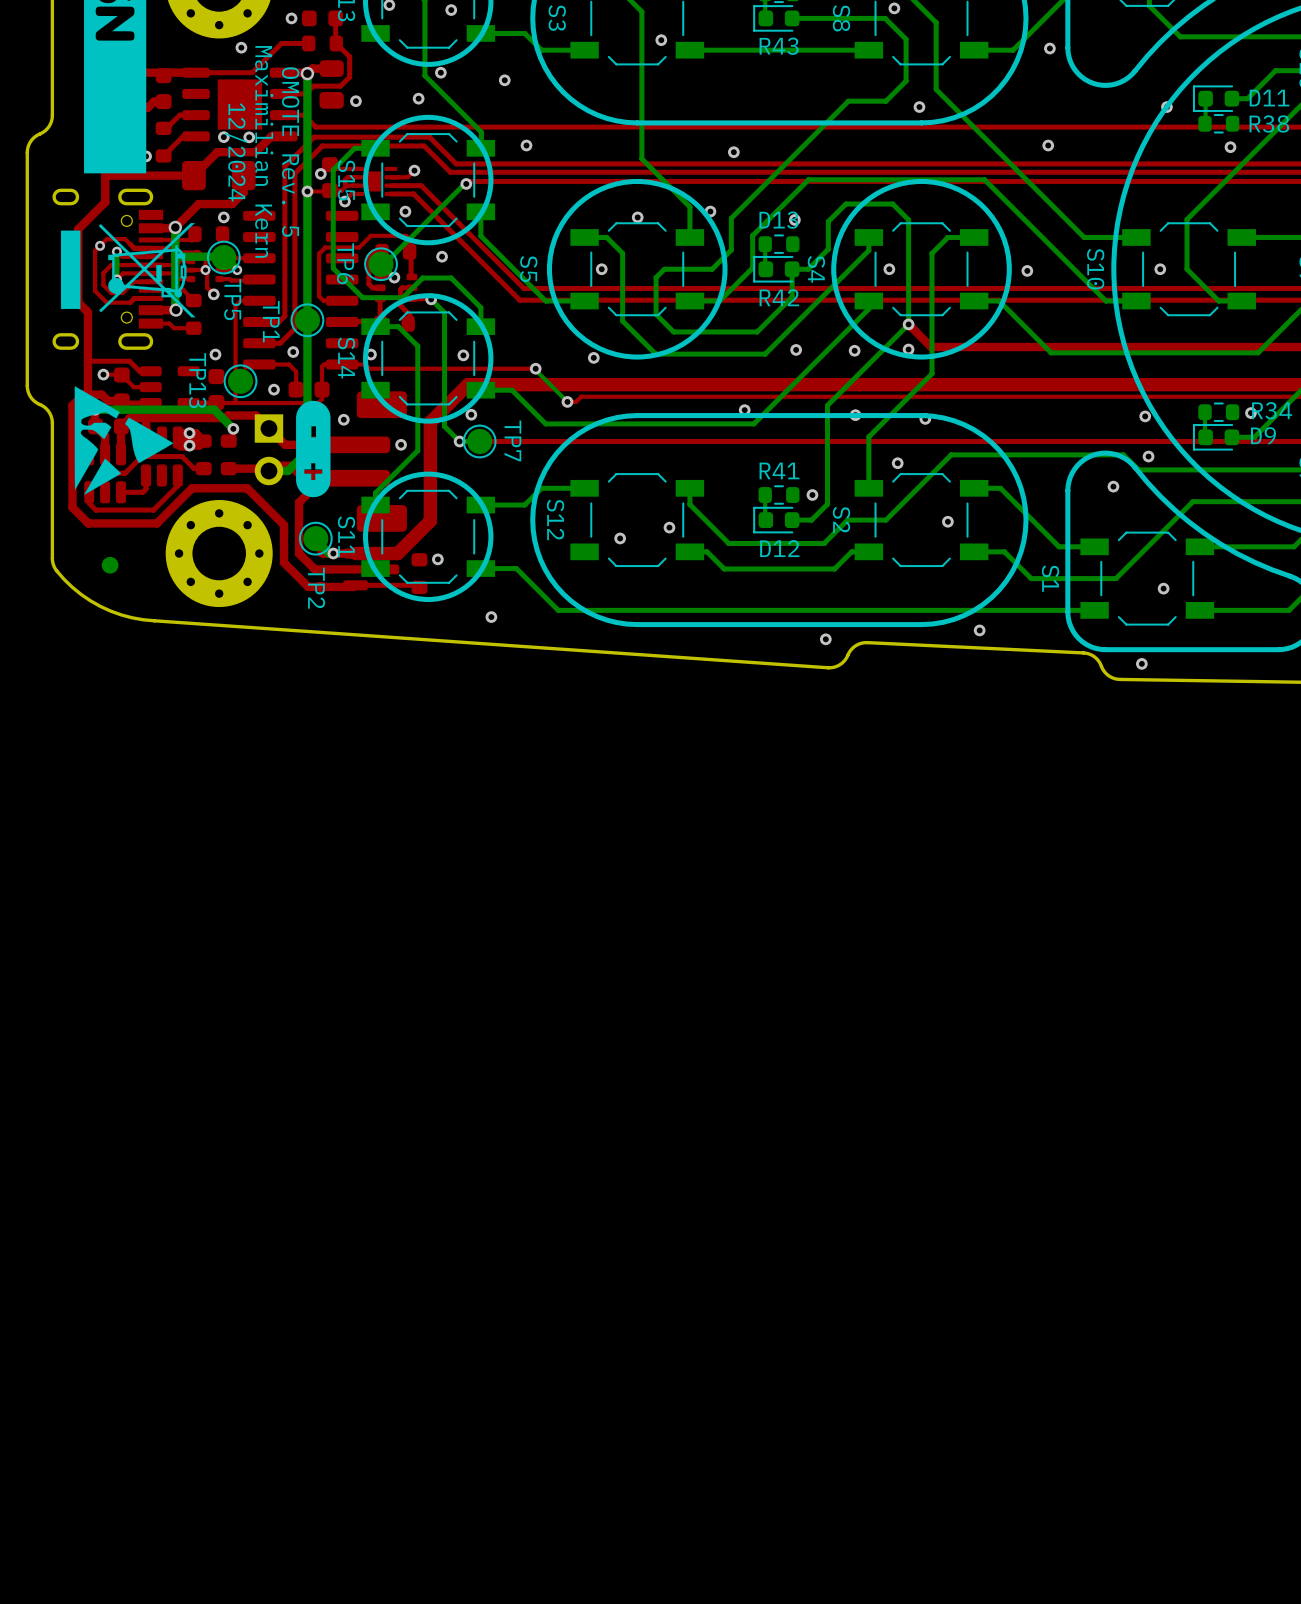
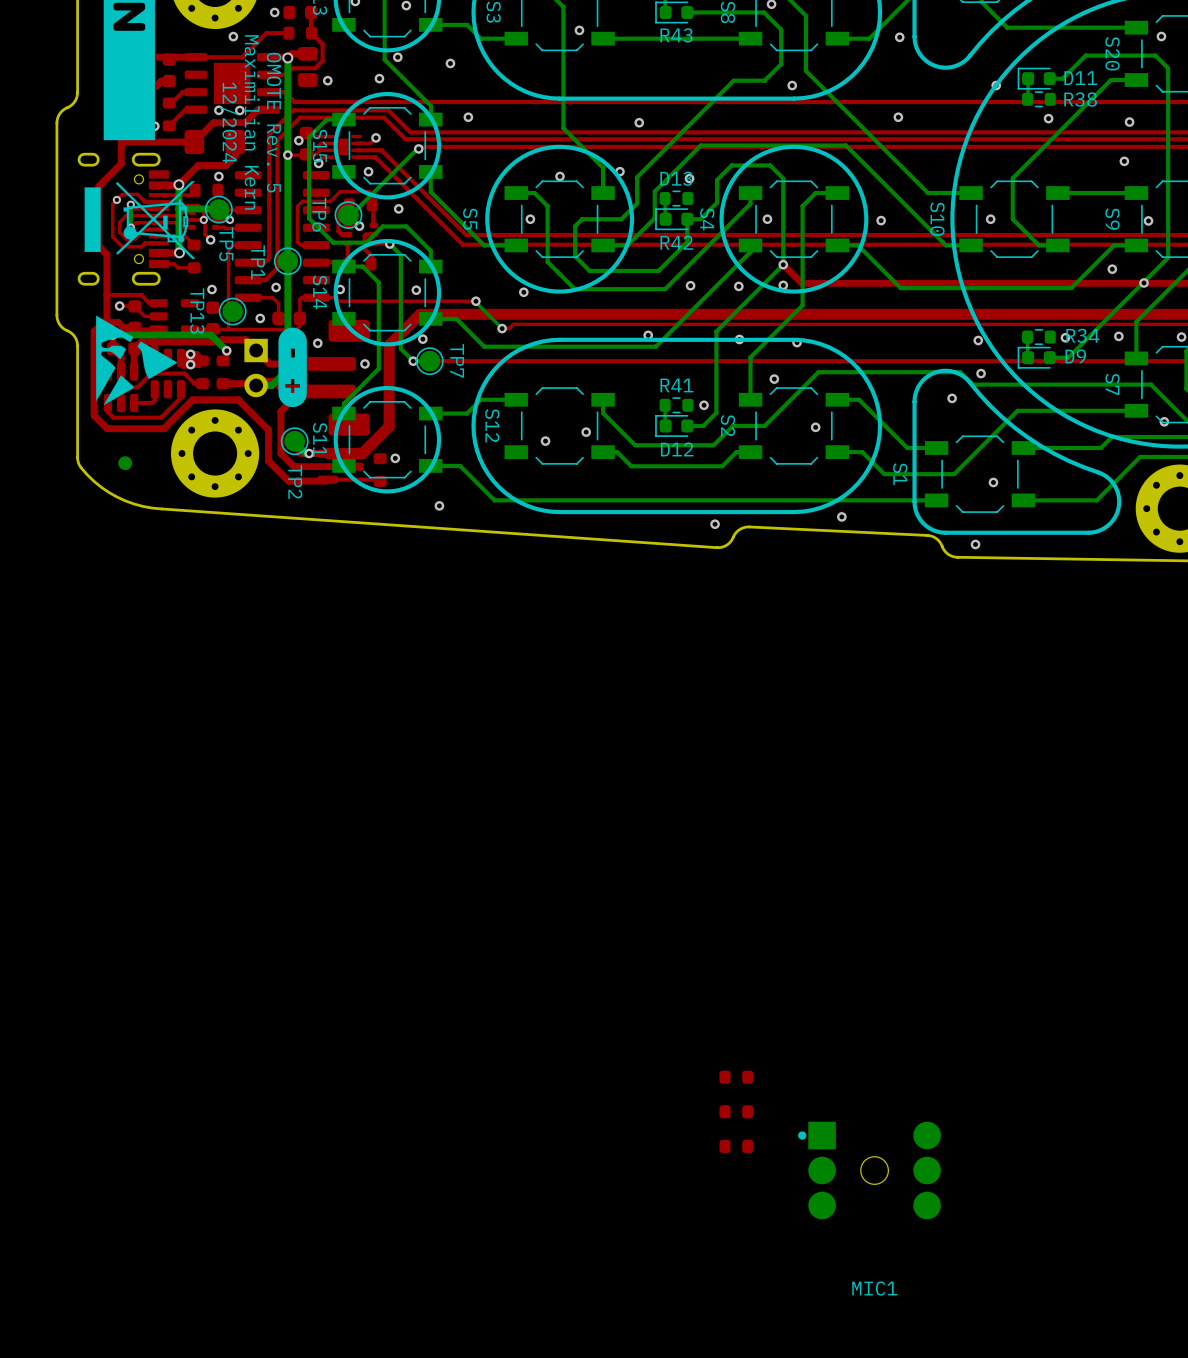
part: none -> (736, 1077)
part: none -> (736, 1111)
part: none -> (736, 1146)
MIC1: none -> (869, 1170)

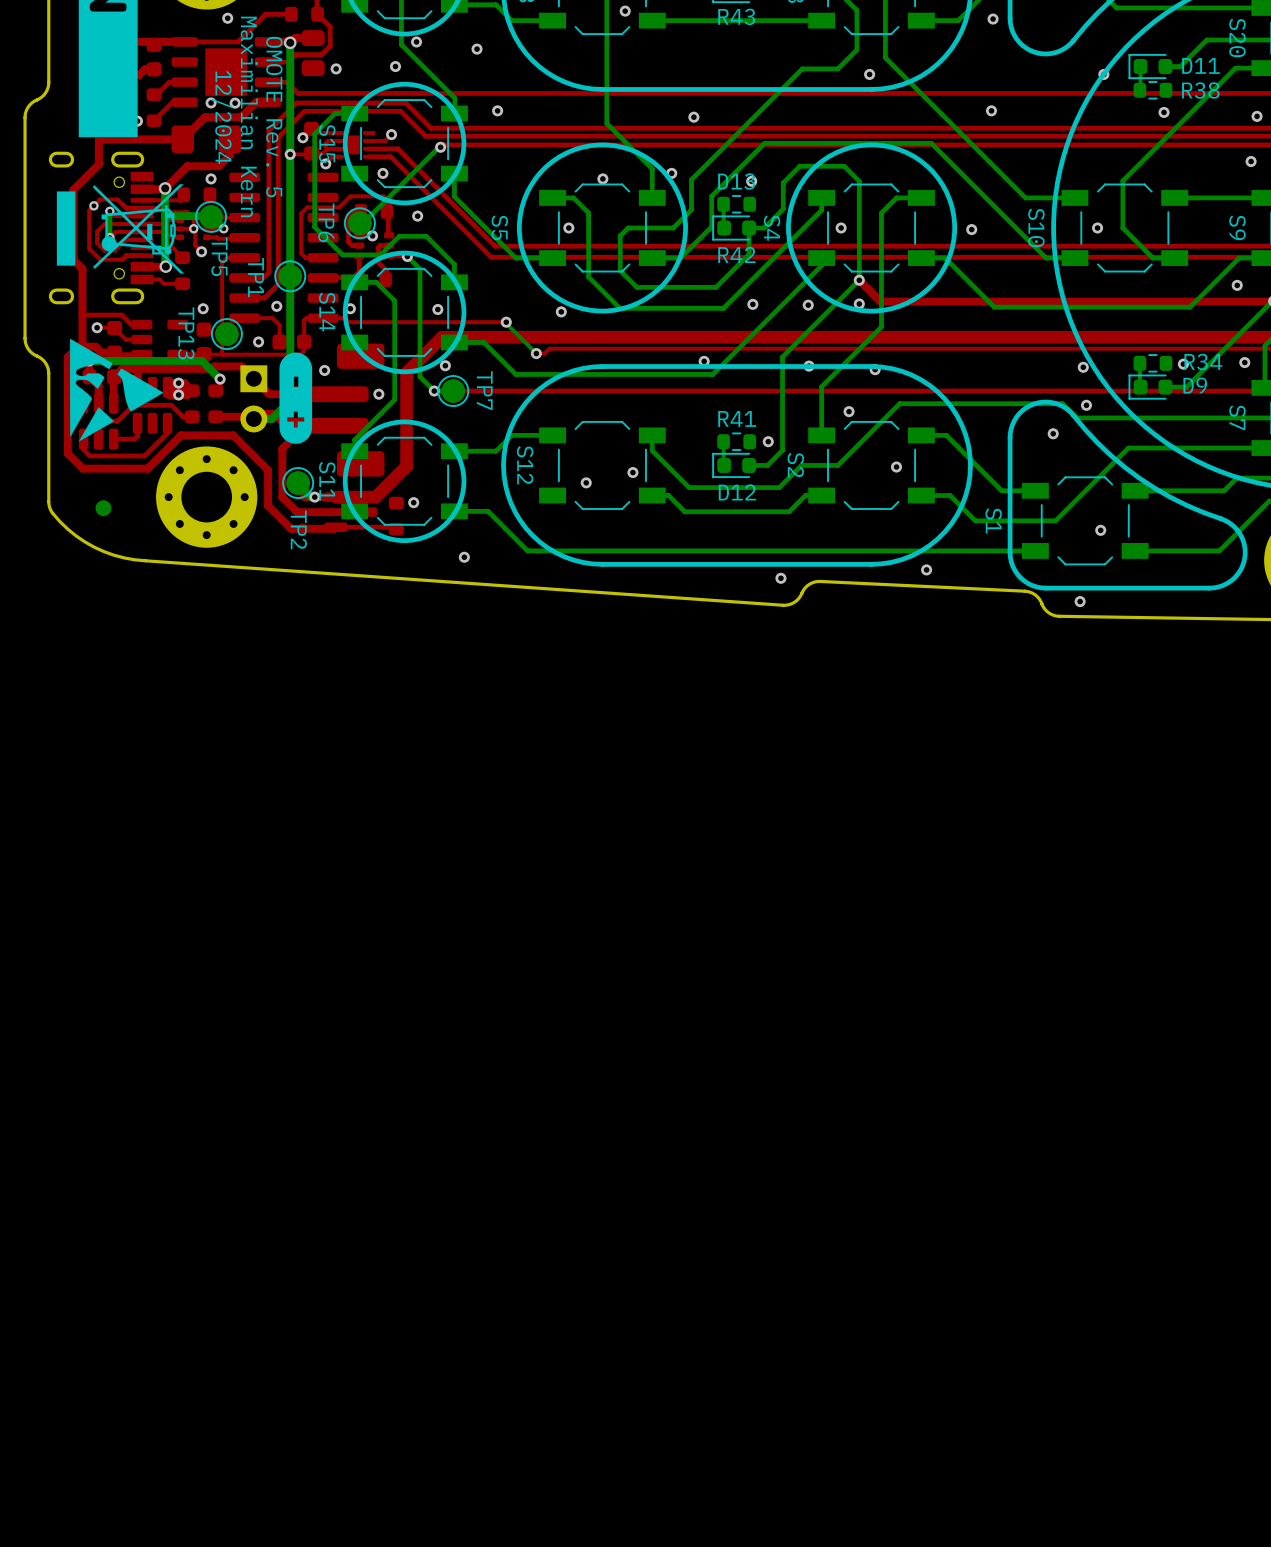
part: (736, 1077) -> none
part: (736, 1111) -> none
part: (736, 1146) -> none
MIC1: (869, 1170) -> none

